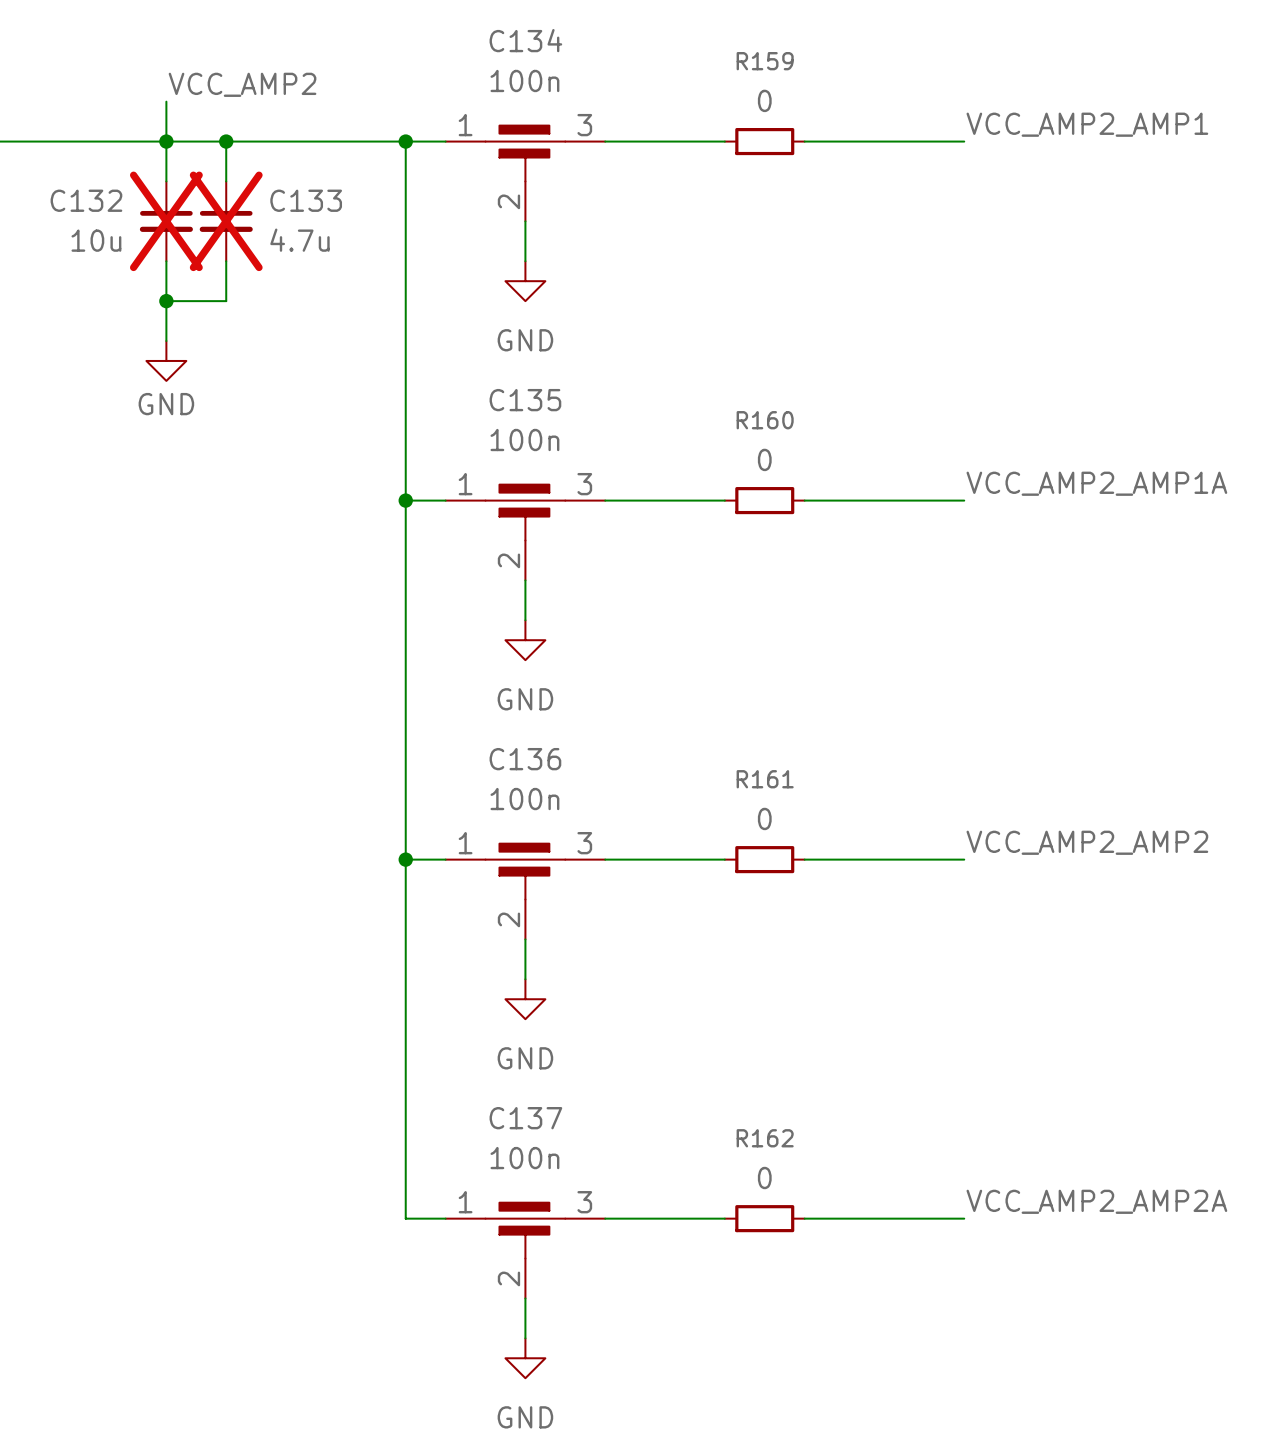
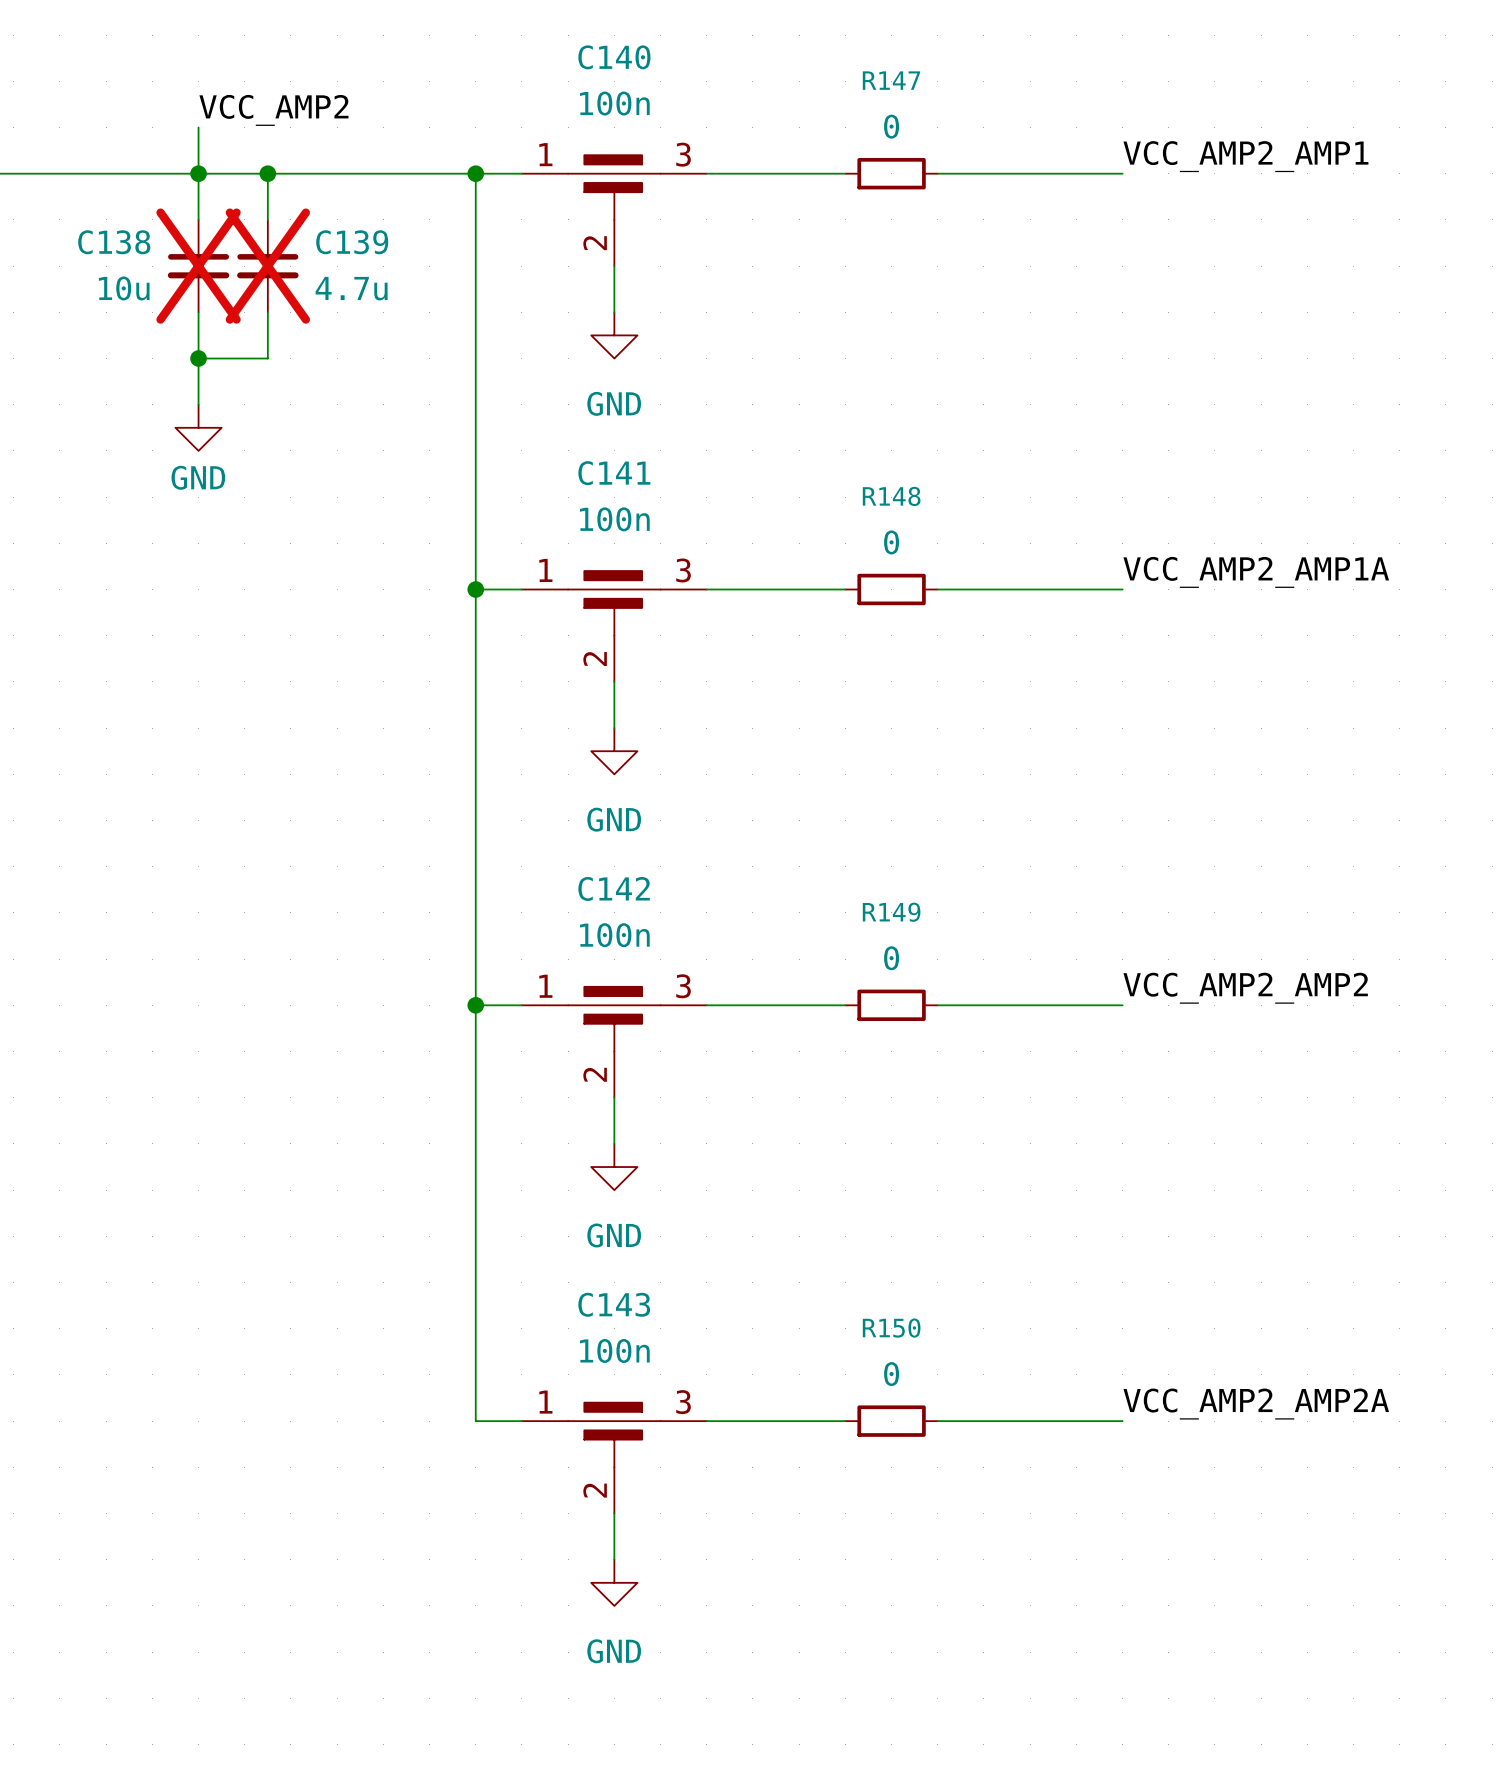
C134 name: C134 (525, 40) -> C140 (614, 57)
R159 name: R159 (765, 61) -> R147 (891, 80)
C132 name: C132 (86, 200) -> C138 (114, 242)
C133 name: C133 (306, 200) -> C139 (352, 242)
C135 name: C135 (525, 400) -> C141 (614, 473)
R160 name: R160 (765, 420) -> R148 (891, 496)
C136 name: C136 (525, 759) -> C142 (614, 888)
R161 name: R161 (765, 779) -> R149 (891, 912)
C137 name: C137 (525, 1118) -> C143 (614, 1304)
R162 name: R162 (765, 1138) -> R150 (891, 1328)

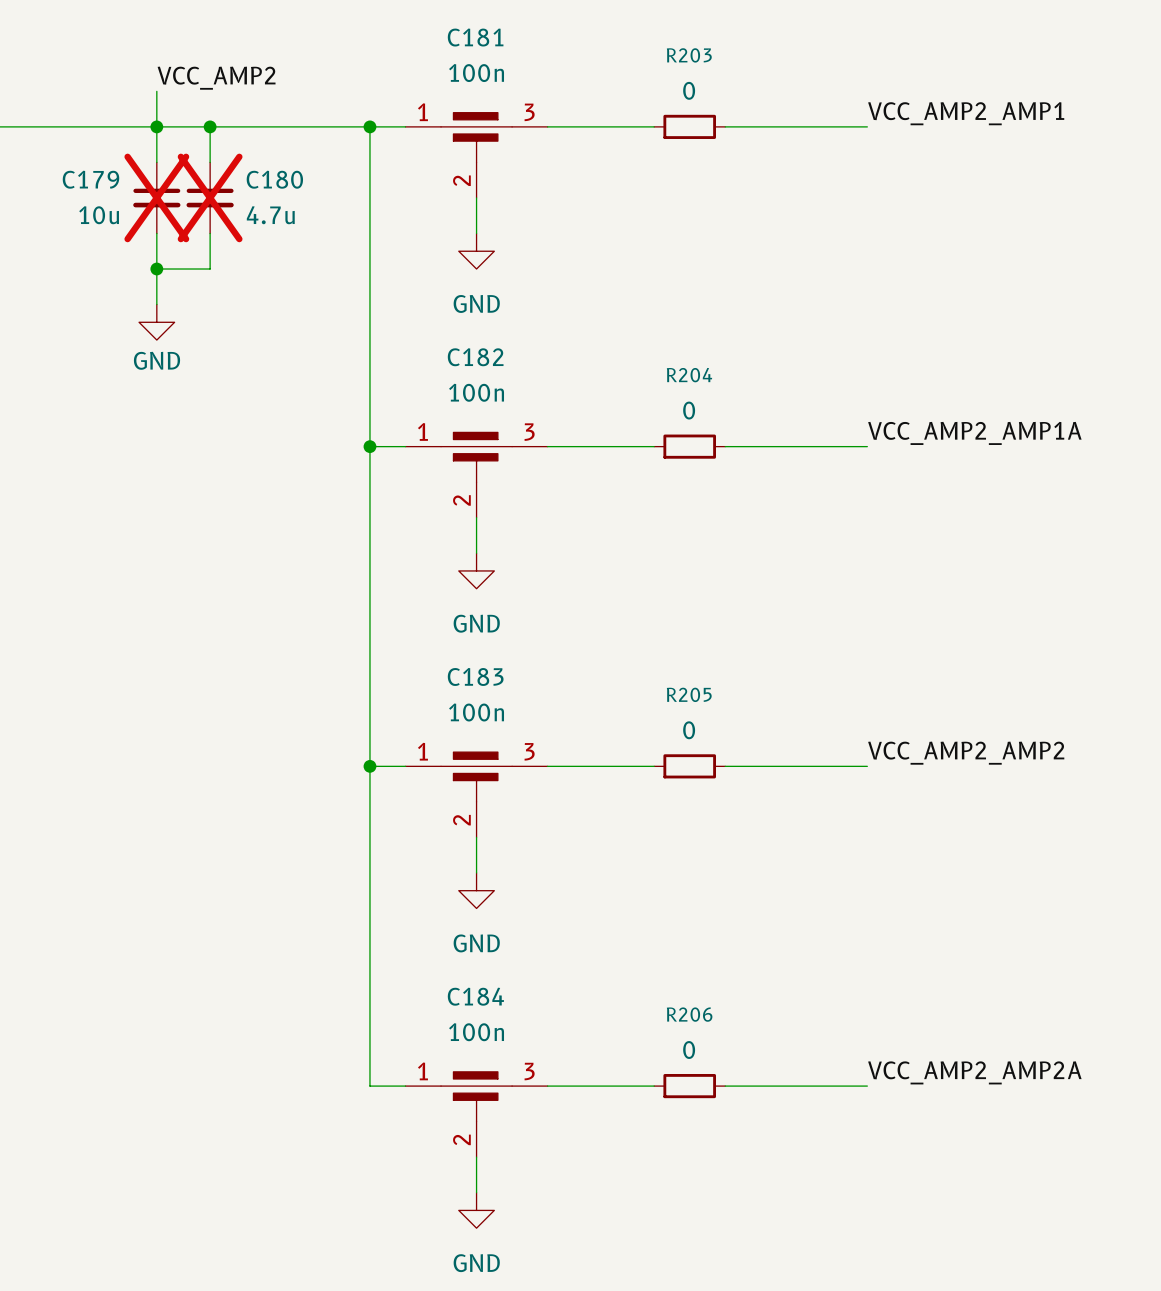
C140 name: C140 (614, 57) -> C181 (475, 37)
R147 name: R147 (891, 80) -> R203 (689, 55)
C138 name: C138 (114, 242) -> C179 (90, 179)
C139 name: C139 (352, 242) -> C180 (274, 179)
C141 name: C141 (614, 473) -> C182 (475, 357)
R148 name: R148 (891, 496) -> R204 (689, 375)
C142 name: C142 (614, 888) -> C183 (475, 676)
R149 name: R149 (891, 912) -> R205 (689, 694)
C143 name: C143 (614, 1304) -> C184 (475, 996)
R150 name: R150 (891, 1328) -> R206 (689, 1014)

